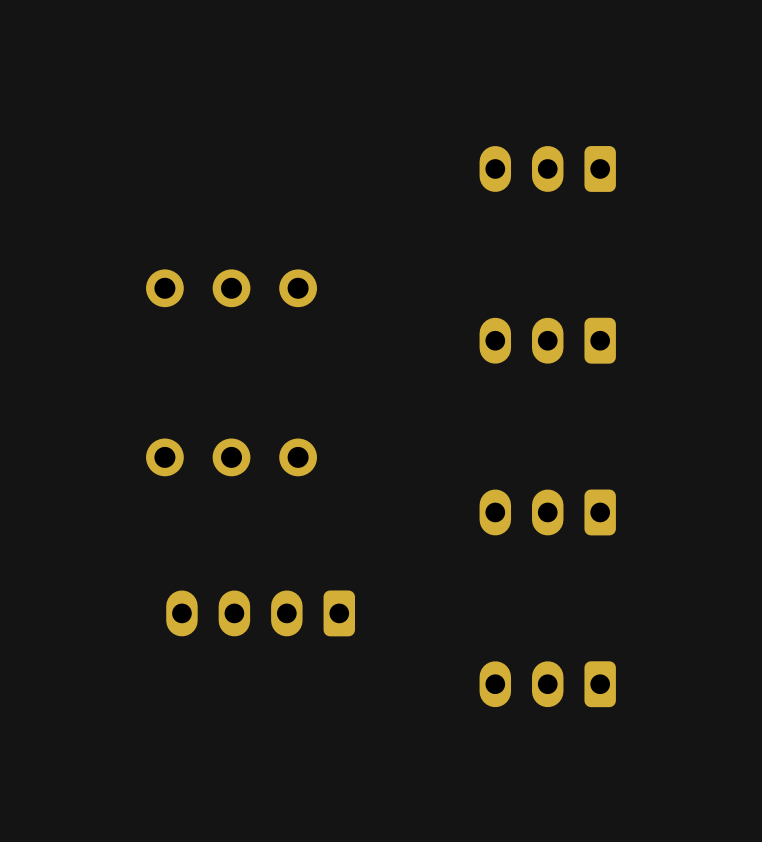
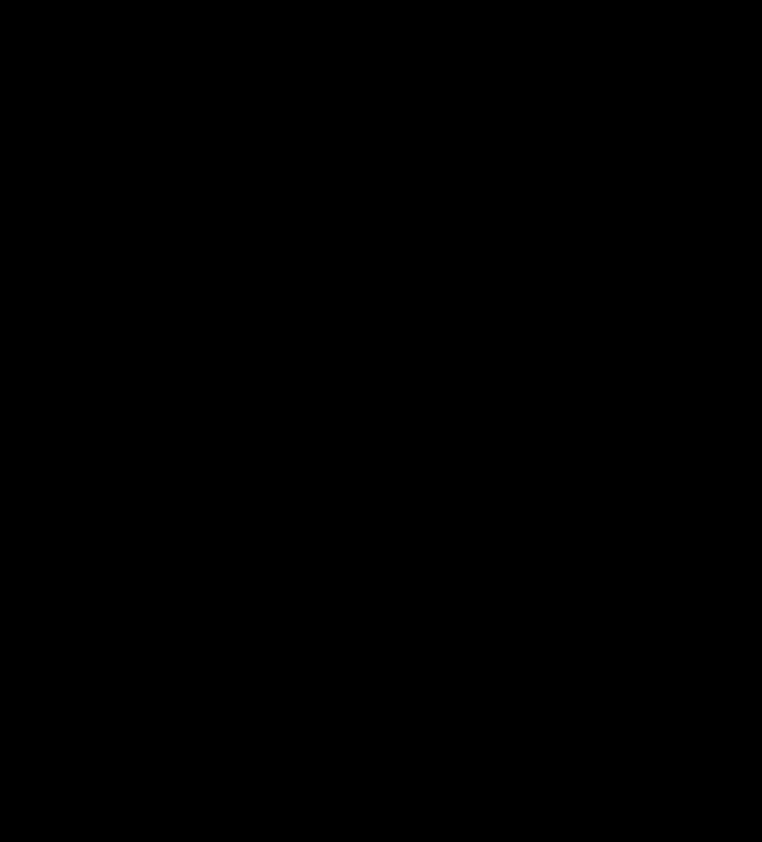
part: (547, 168) -> none
part: (231, 288) -> none
part: (547, 340) -> none
part: (231, 457) -> none
part: (547, 512) -> none
part: (260, 613) -> none
part: (547, 684) -> none

